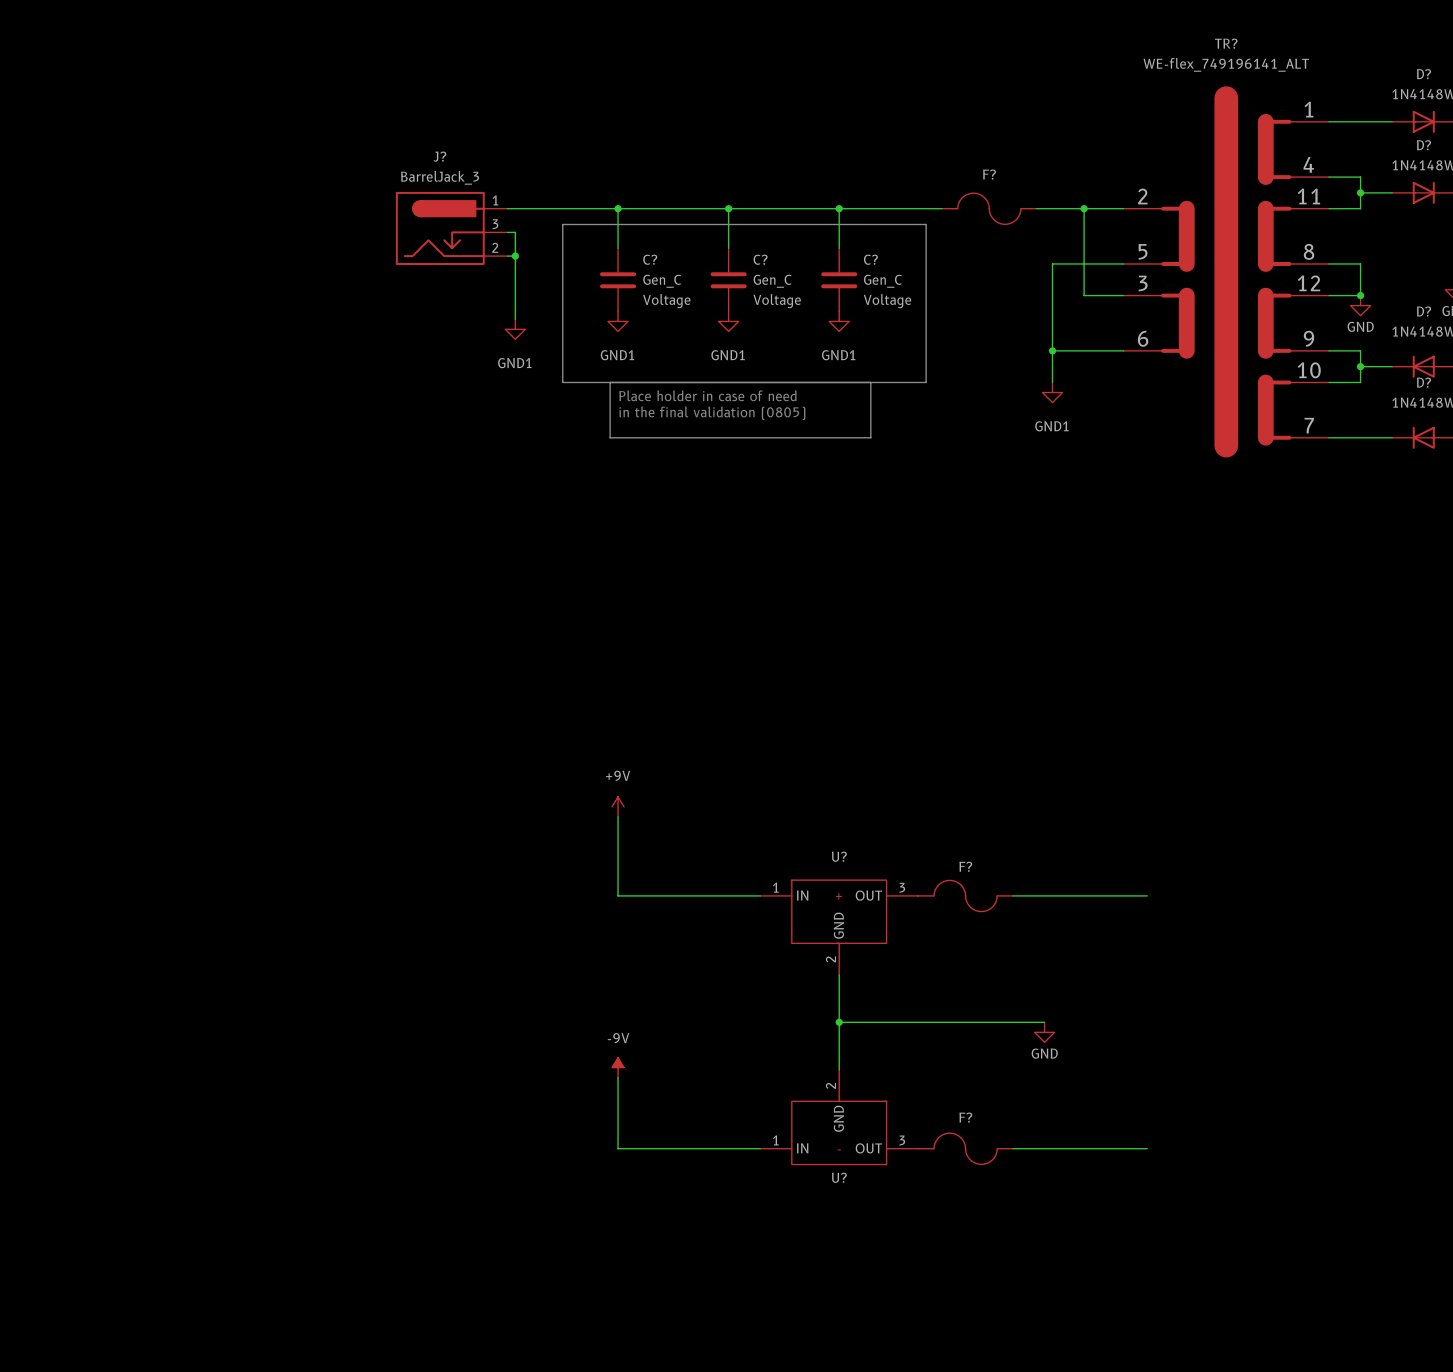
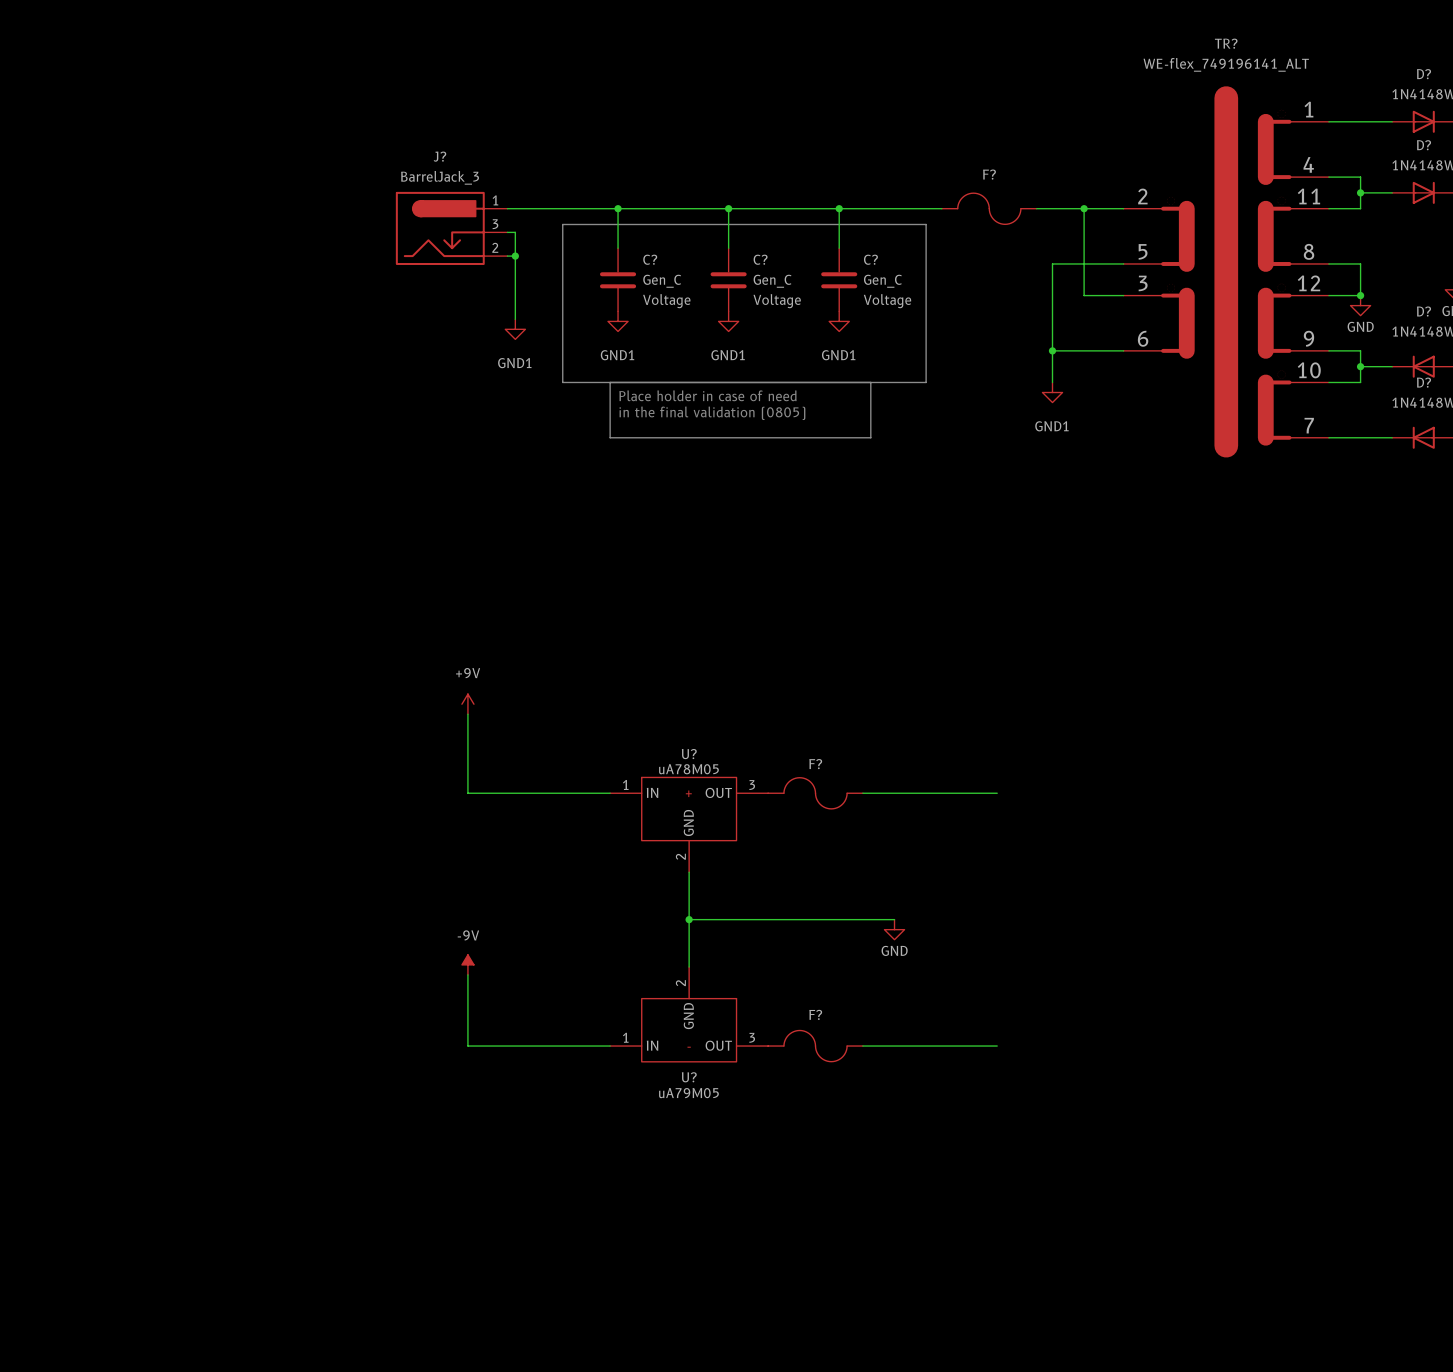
F?: none -> (815, 793)
power symbol position: +9V (618, 806) -> +9V (467, 704)
wire: (618, 816) (618, 895) (760, 895) -> (467, 714) (467, 793) (610, 793)
U?: none -> uA78M05 (689, 824)
F?: (965, 895) -> none
wire: (1013, 895) (1147, 895) -> (862, 793) (997, 793)
junction: none -> (689, 919)
U?: (839, 927) -> none
wire: (839, 974) (839, 1069) -> (689, 872) (689, 967)
U?: none -> uA79M05 (689, 1014)
wire: (839, 1022) (1044, 1022) -> (689, 919) (894, 919)
junction: (839, 1022) -> none
power symbol position: GND (1044, 1032) -> GND (894, 929)
F?: none -> (815, 1046)
power symbol position: -9V (618, 1067) -> -9V (467, 964)
wire: (618, 1077) (618, 1148) (760, 1148) -> (467, 974) (467, 1046) (610, 1046)
U?: (839, 1117) -> none
F?: (965, 1148) -> none
wire: (1013, 1148) (1147, 1148) -> (862, 1046) (997, 1046)

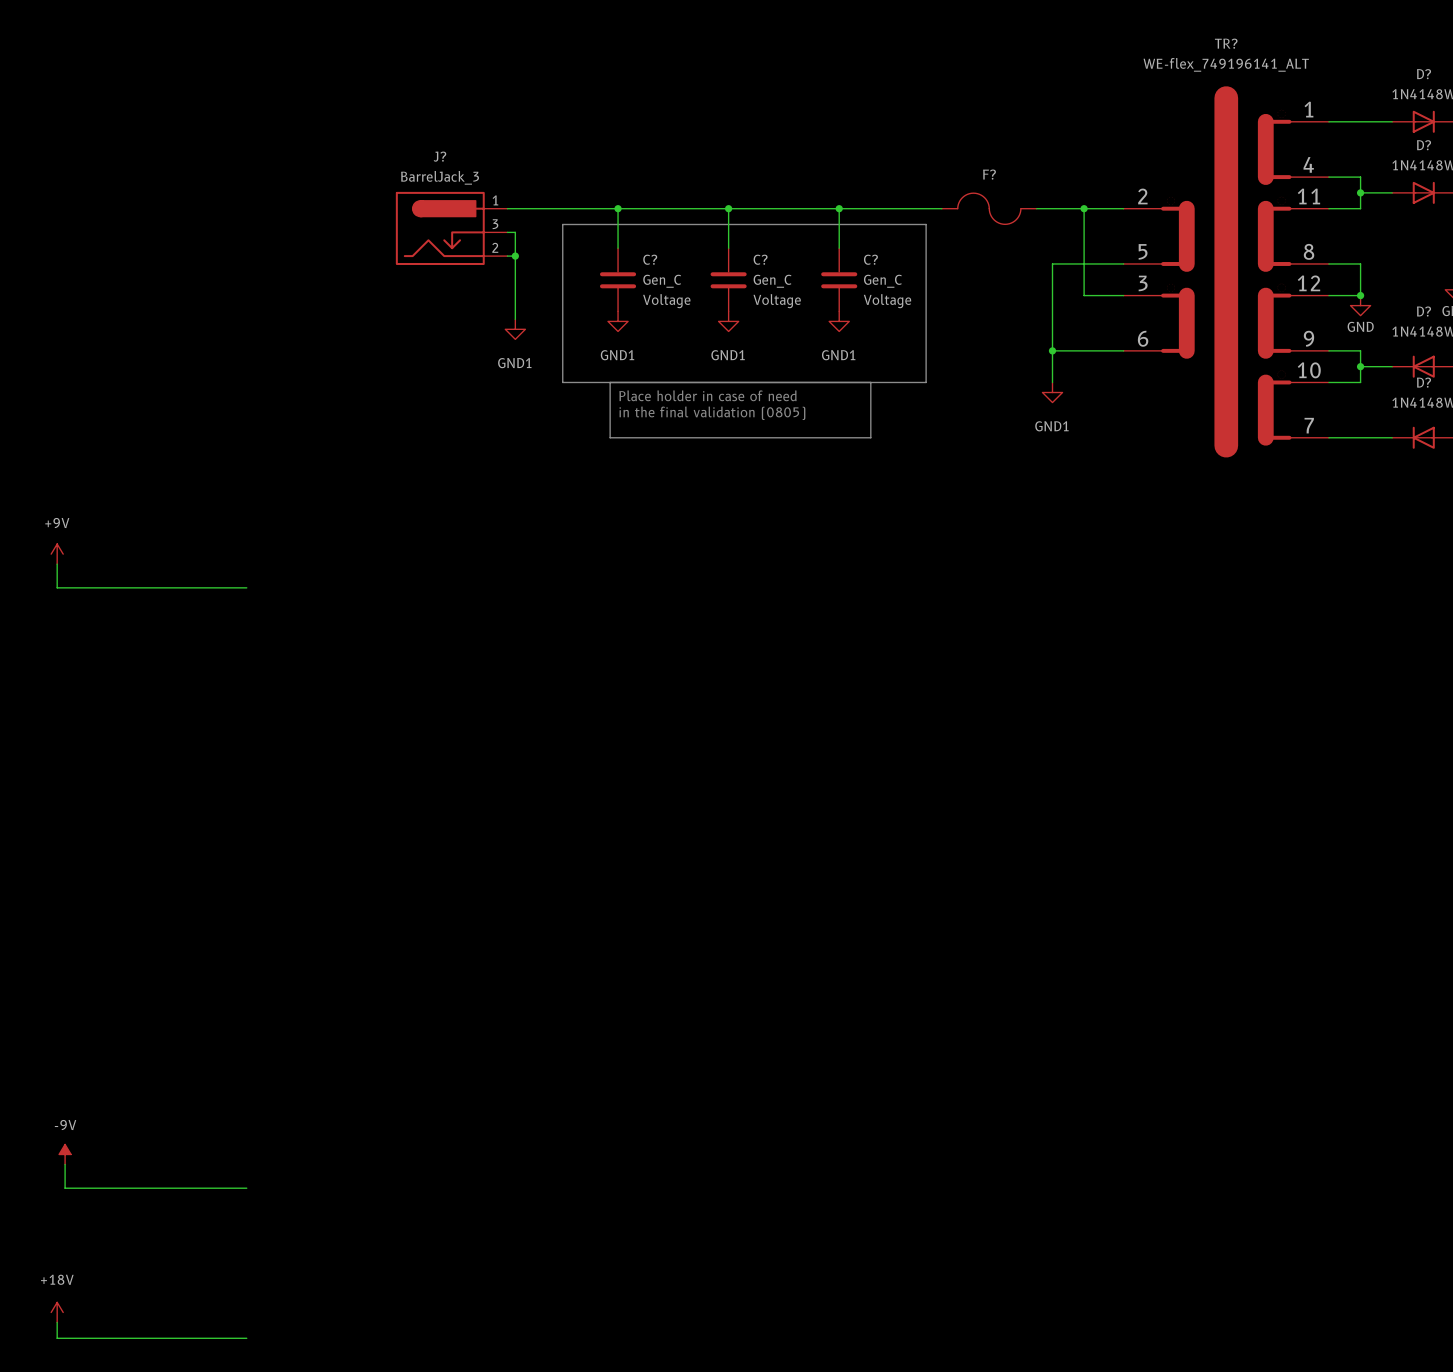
power symbol: none -> +9V (57, 554)
wire: none -> (57, 564) (57, 587) (246, 587)
power symbol: +9V (467, 704) -> none
wire: (467, 714) (467, 793) (610, 793) -> none
F?: (815, 793) -> none
wire: (862, 793) (997, 793) -> none
U?: uA78M05 (689, 824) -> none
wire: (689, 872) (689, 967) -> none
wire: (689, 919) (894, 919) -> none
junction: (689, 919) -> none
power symbol: GND (894, 929) -> none
power symbol: -9V (467, 964) -> none
wire: (467, 974) (467, 1046) (610, 1046) -> none
U?: uA79M05 (689, 1014) -> none
F?: (815, 1046) -> none
wire: (862, 1046) (997, 1046) -> none
power symbol: none -> -9V (65, 1154)
wire: none -> (65, 1164) (65, 1188) (246, 1188)
power symbol: none -> +18V (57, 1312)
wire: none -> (57, 1322) (57, 1338) (246, 1338)

